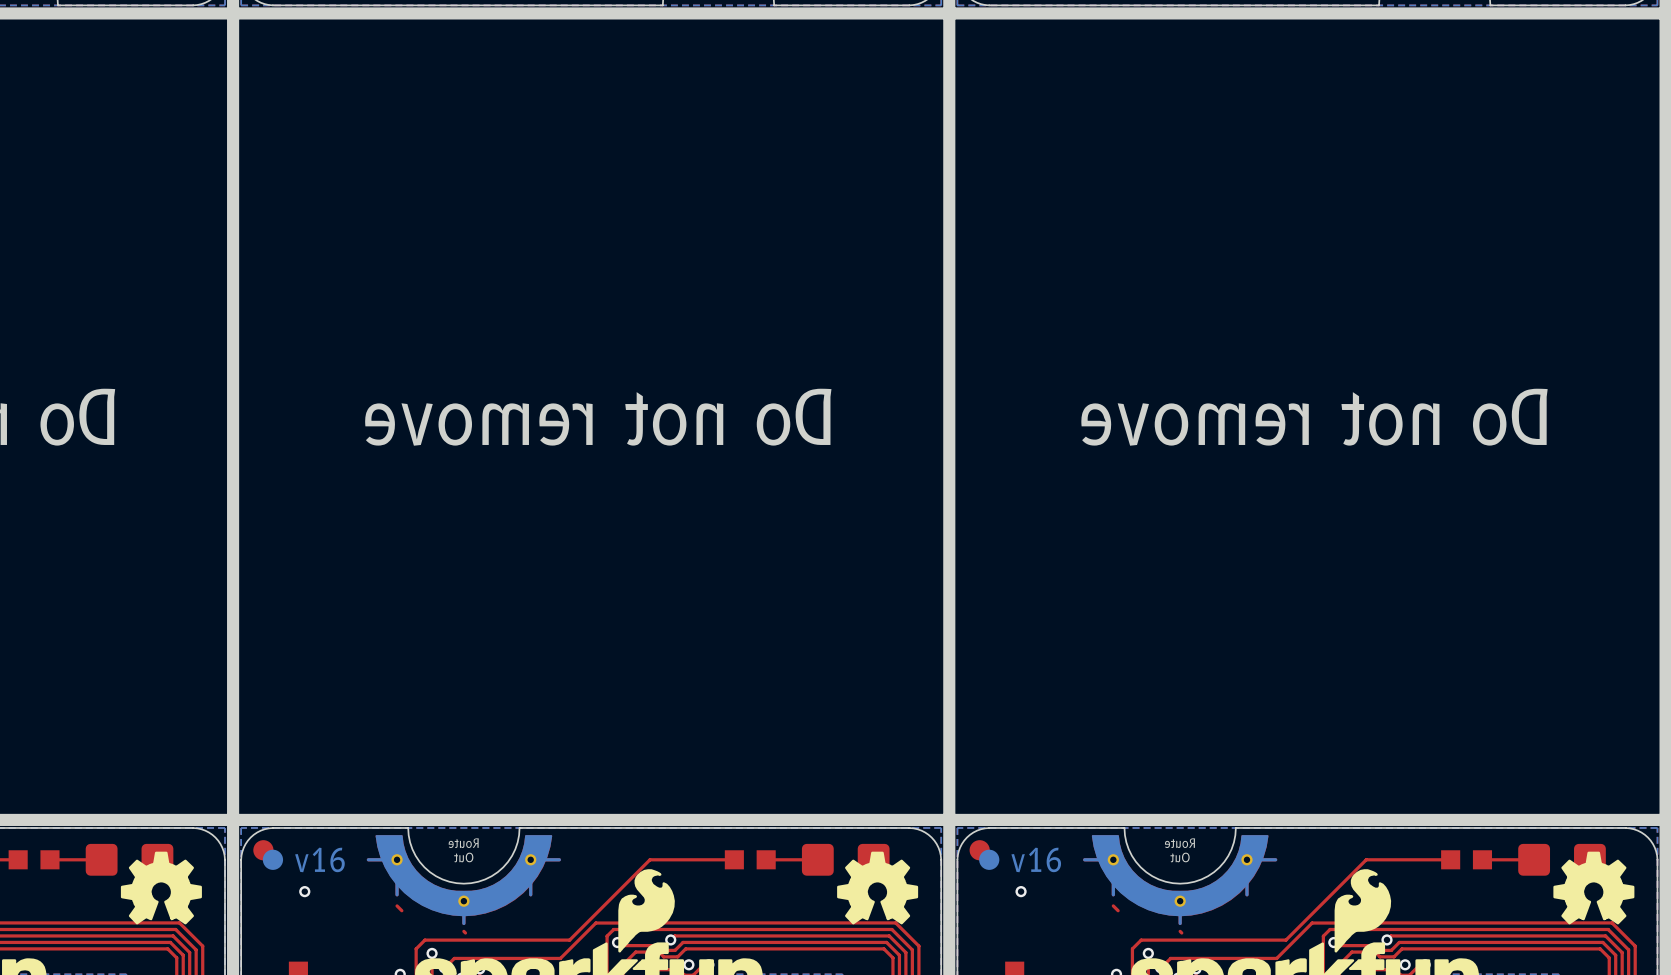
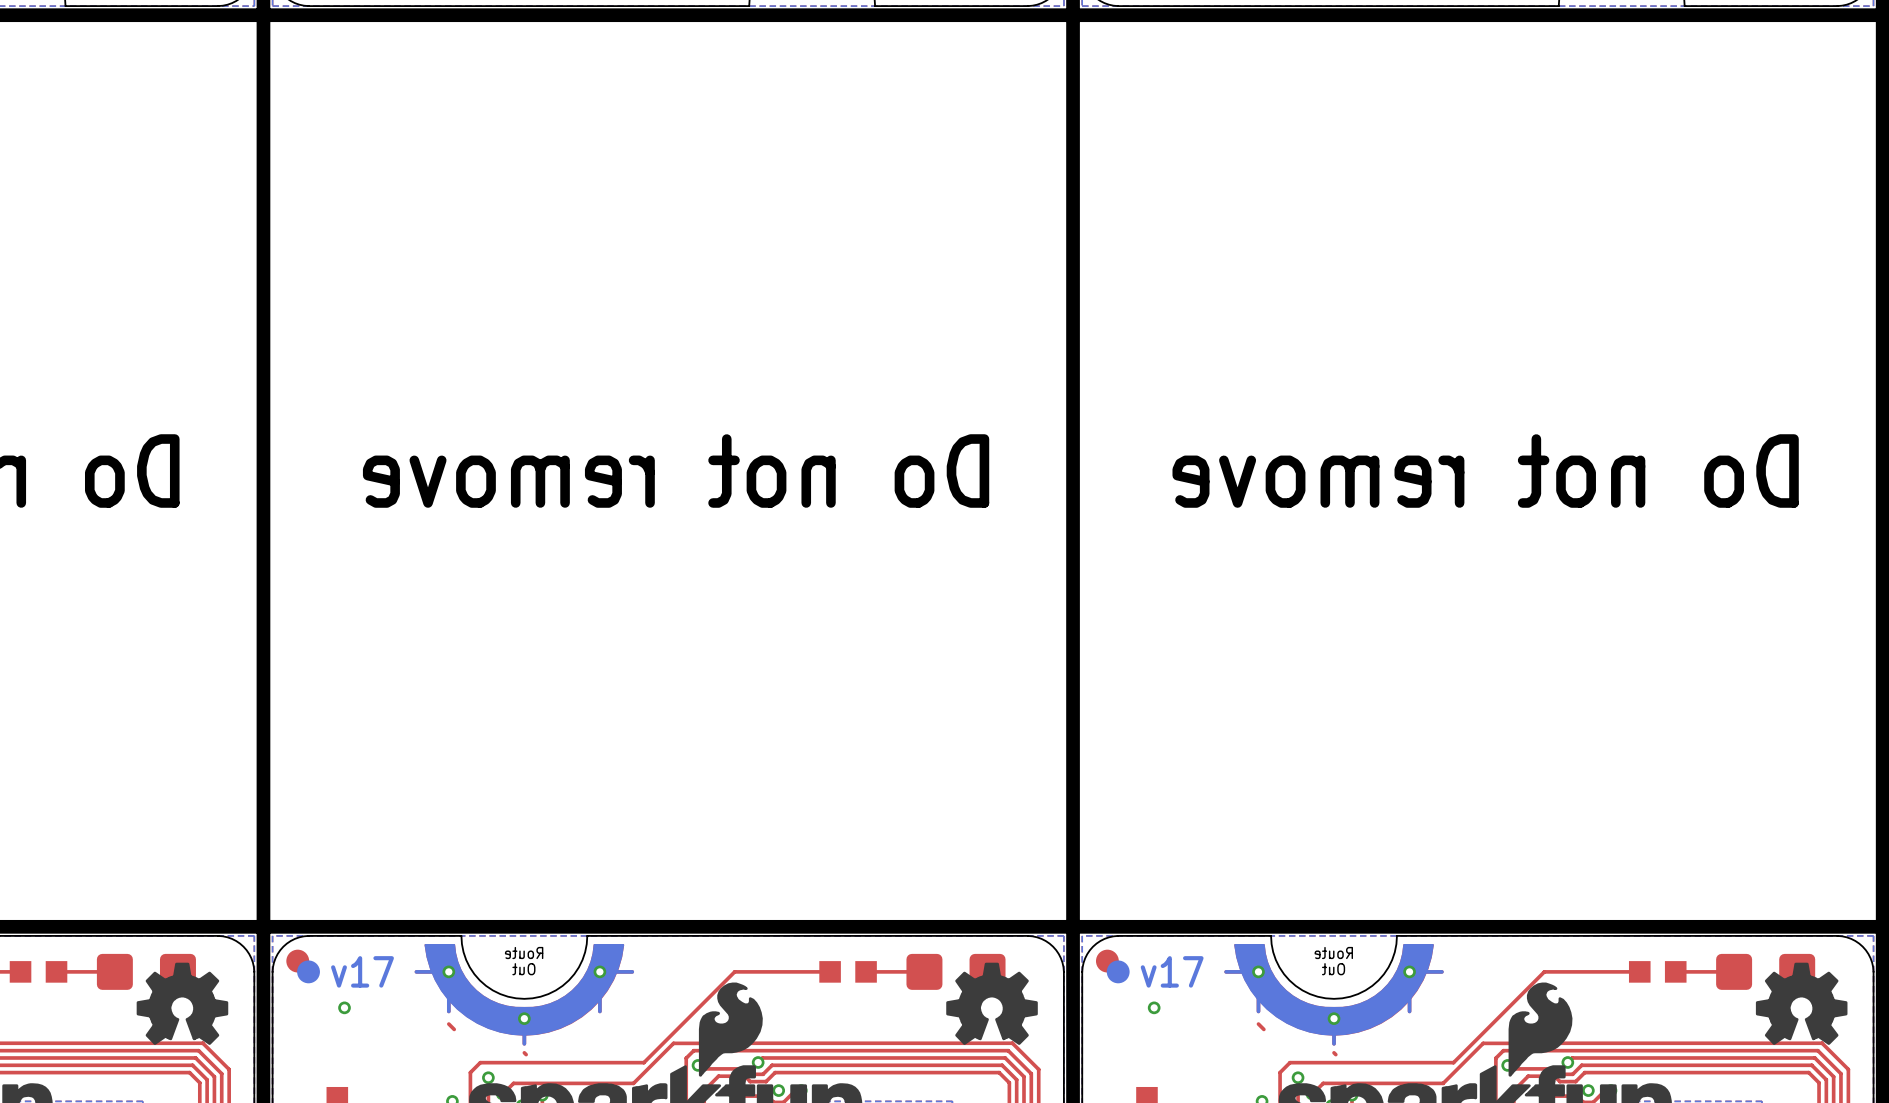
text: v16 (319, 859) -> v17 (362, 971)
text: v16 (1036, 859) -> v17 (1172, 971)

